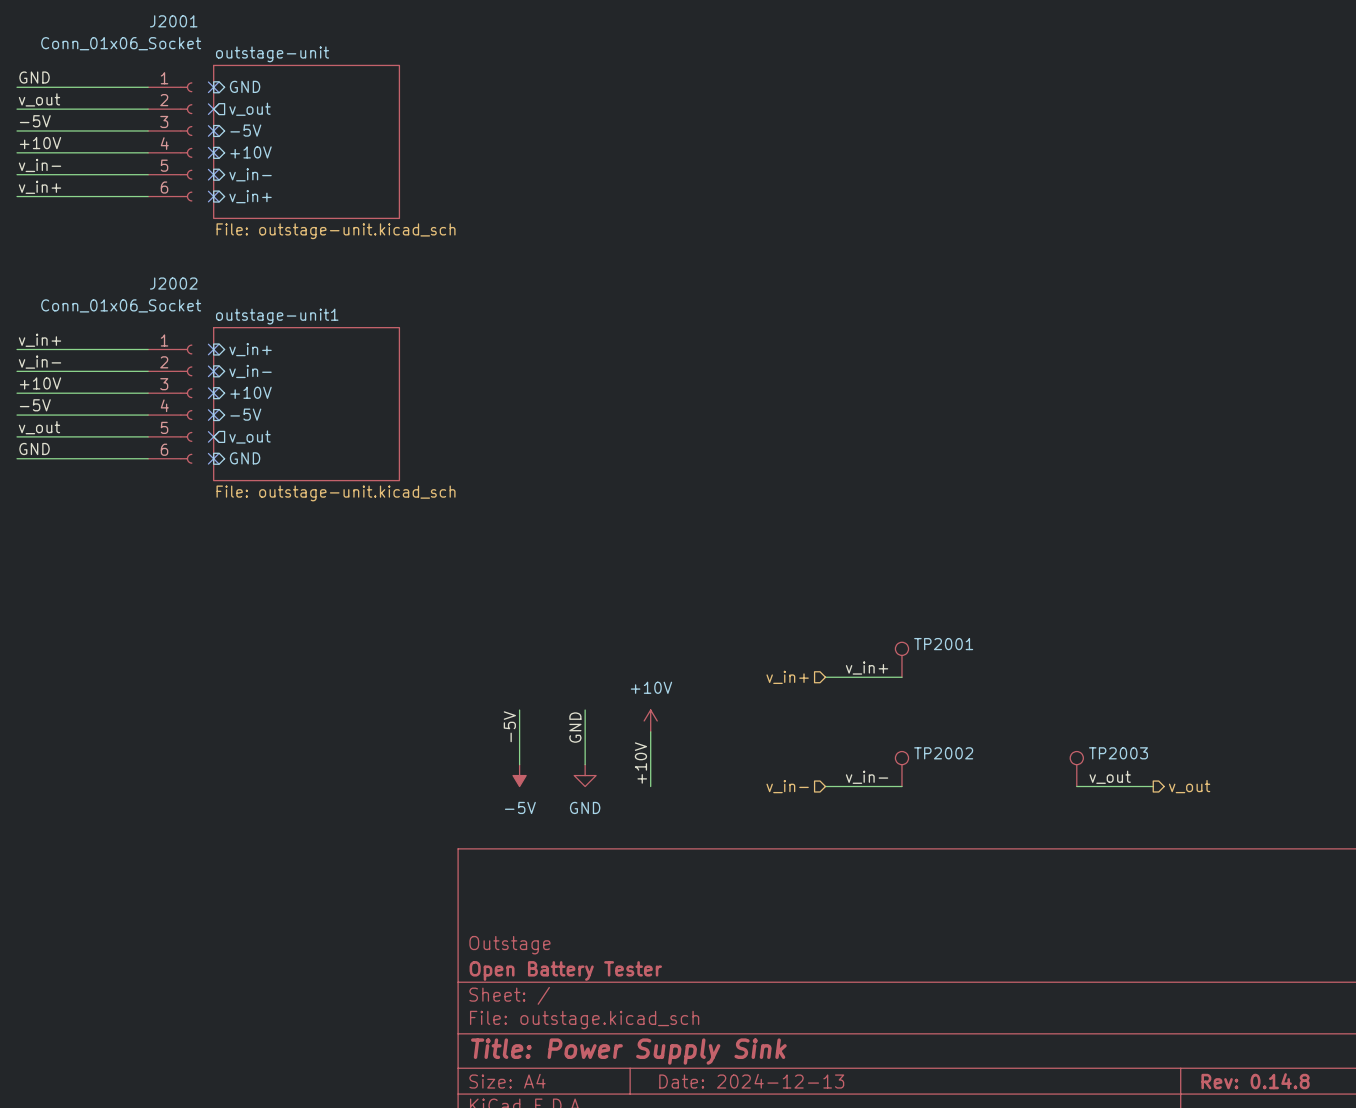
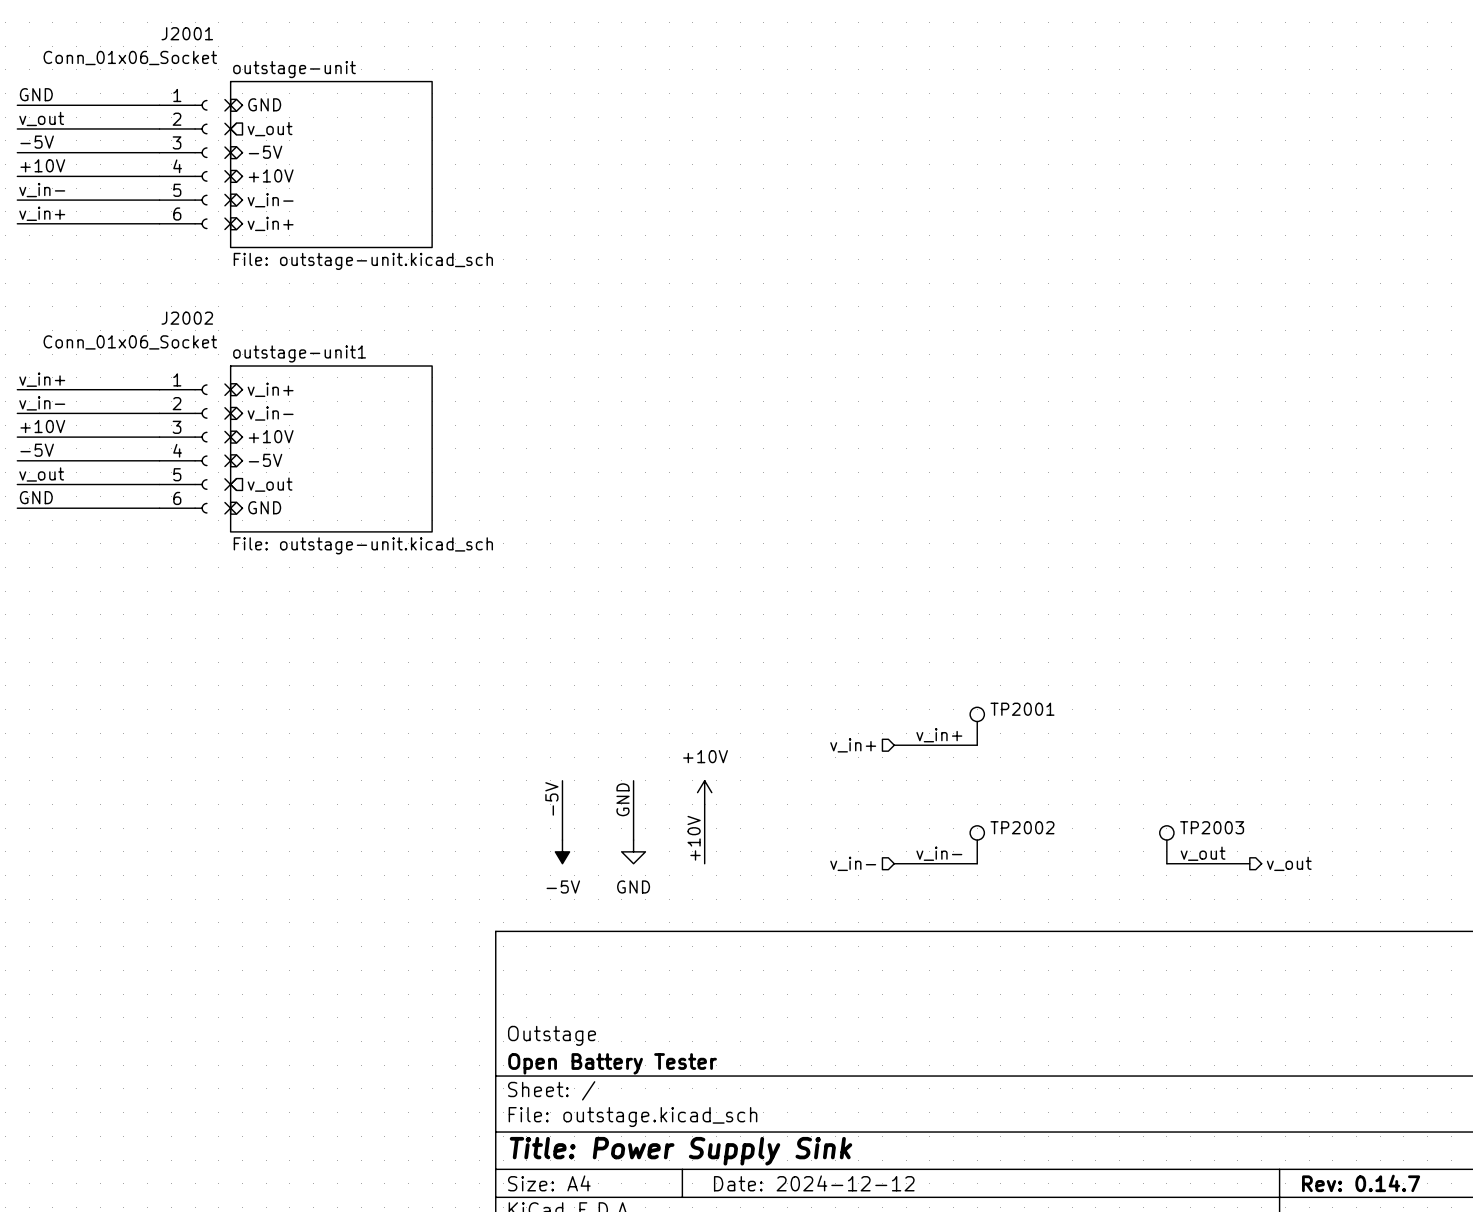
title block: Date: 2024-12-13 (751, 1081) -> Date: 2024-12-12 (814, 1183)
title block: Rev: 0.14.8 (1255, 1081) -> Rev: 0.14.7 (1361, 1183)

